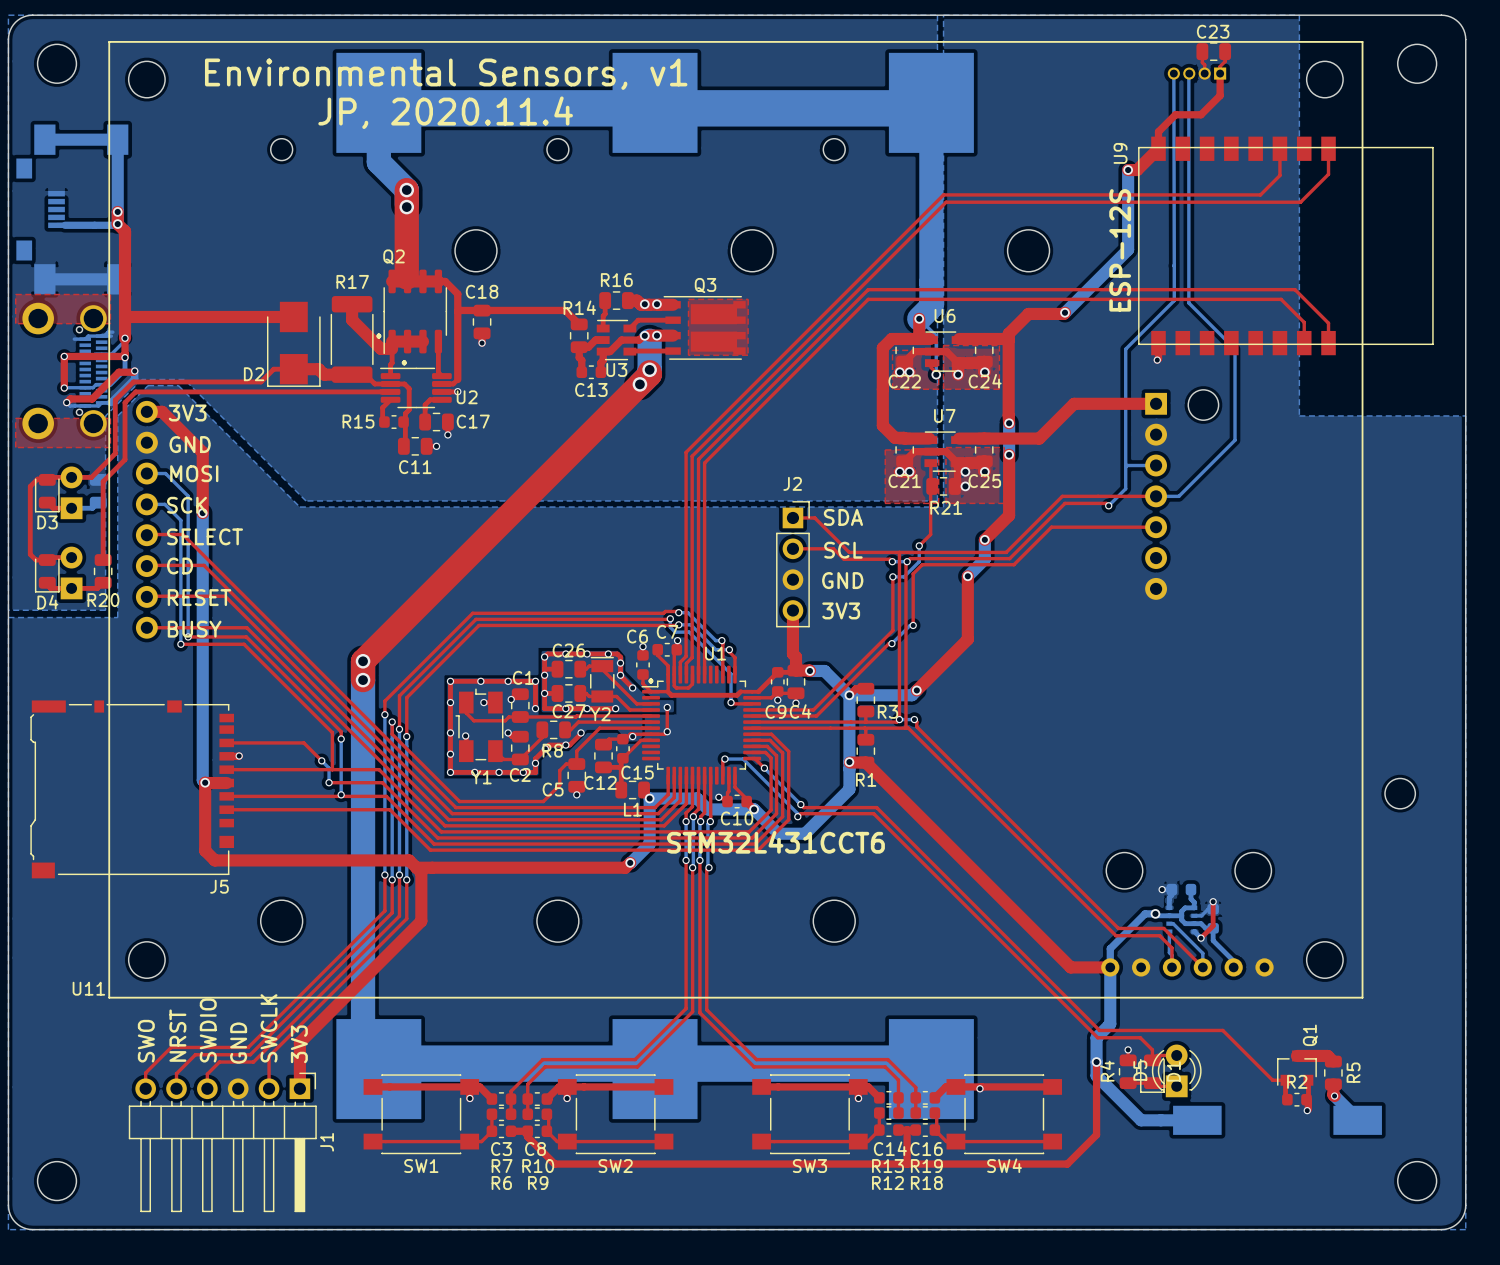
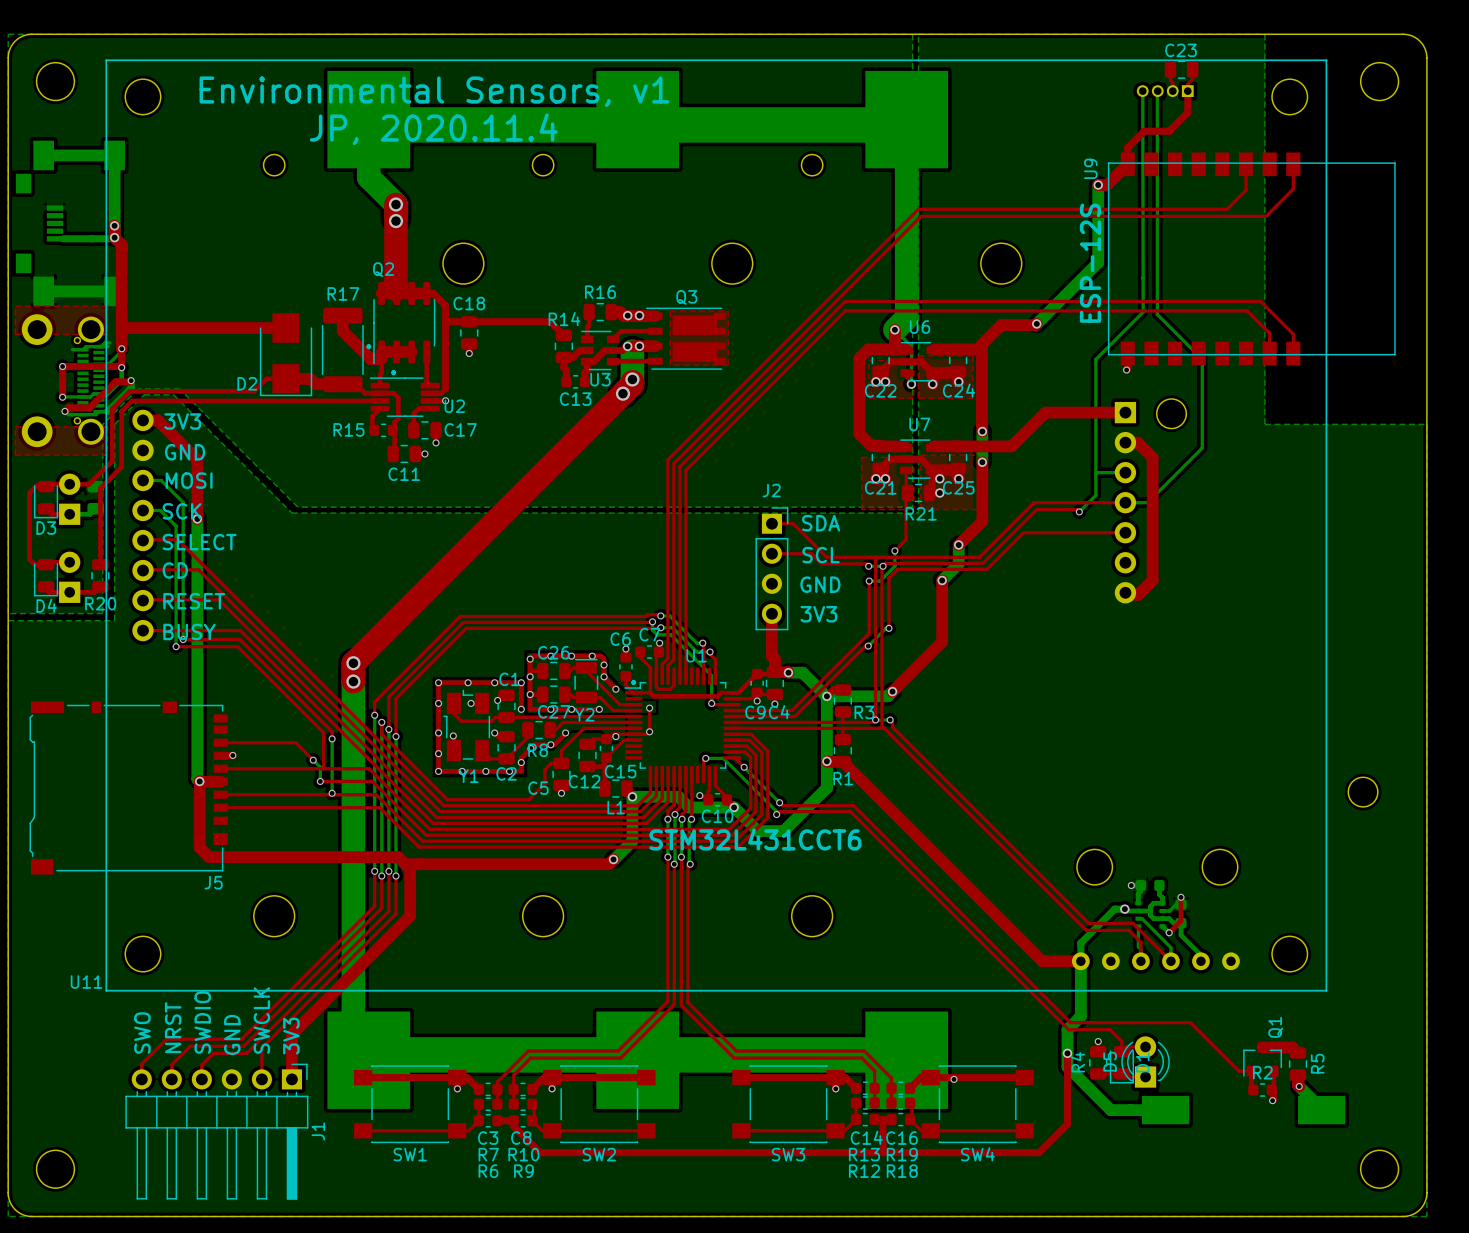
top track: none -> (1125, 442) (1137, 442) (1152, 457) (1152, 580) (1138, 594) (1127, 594) (1125, 592)

